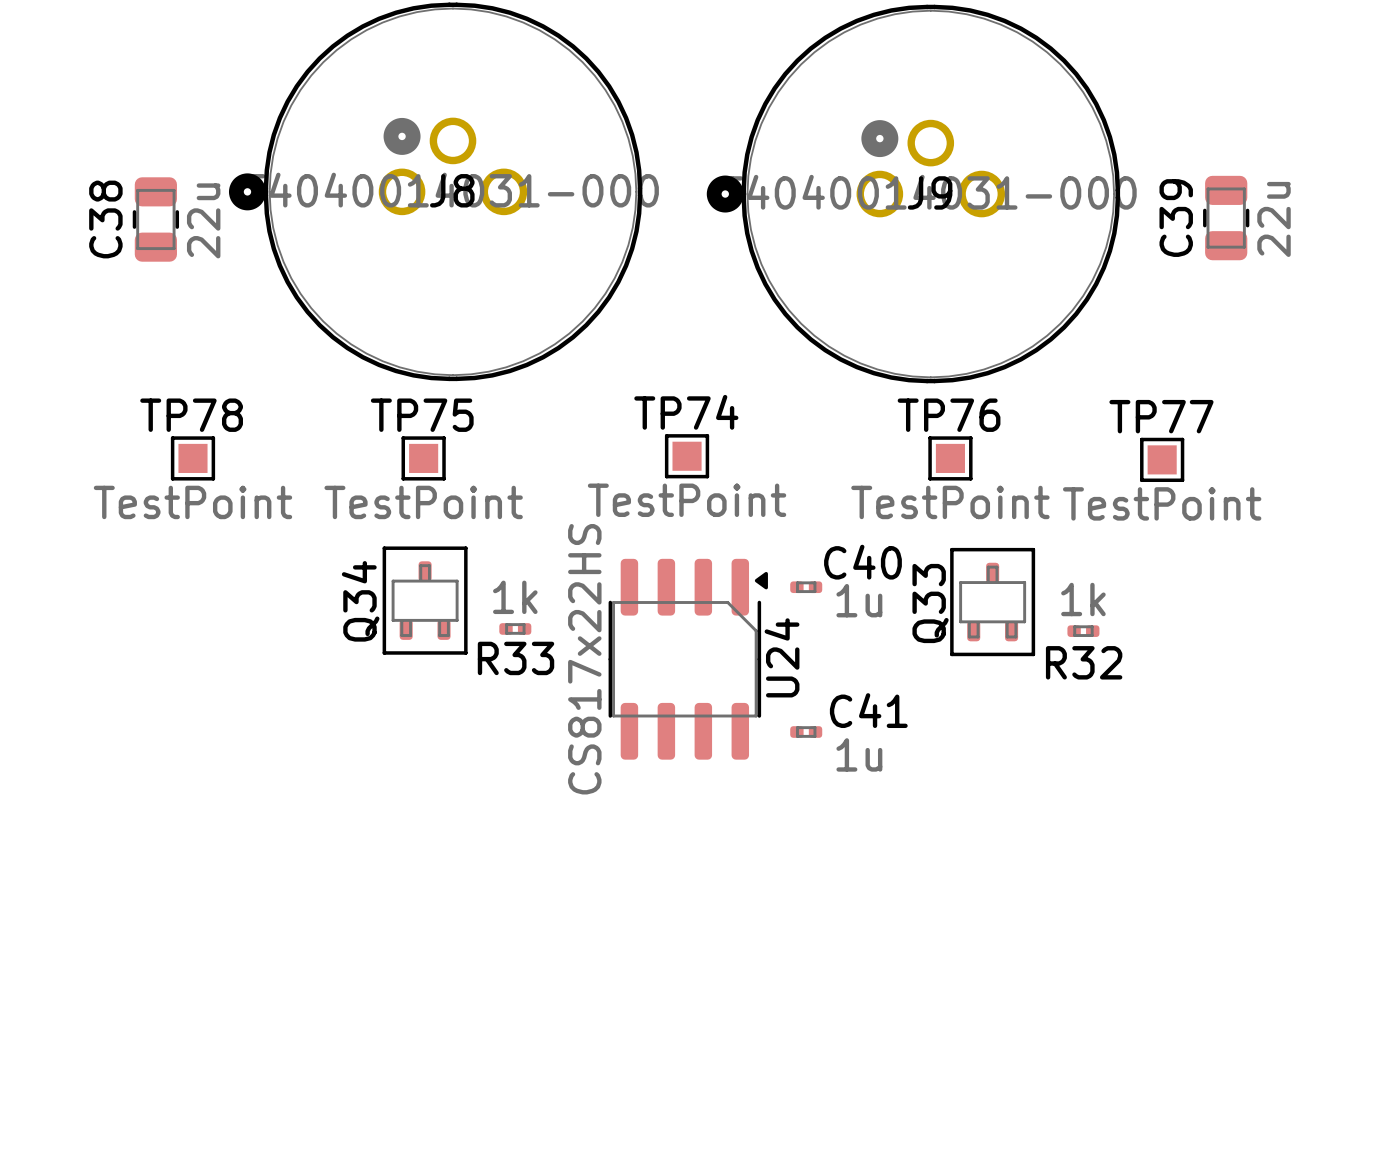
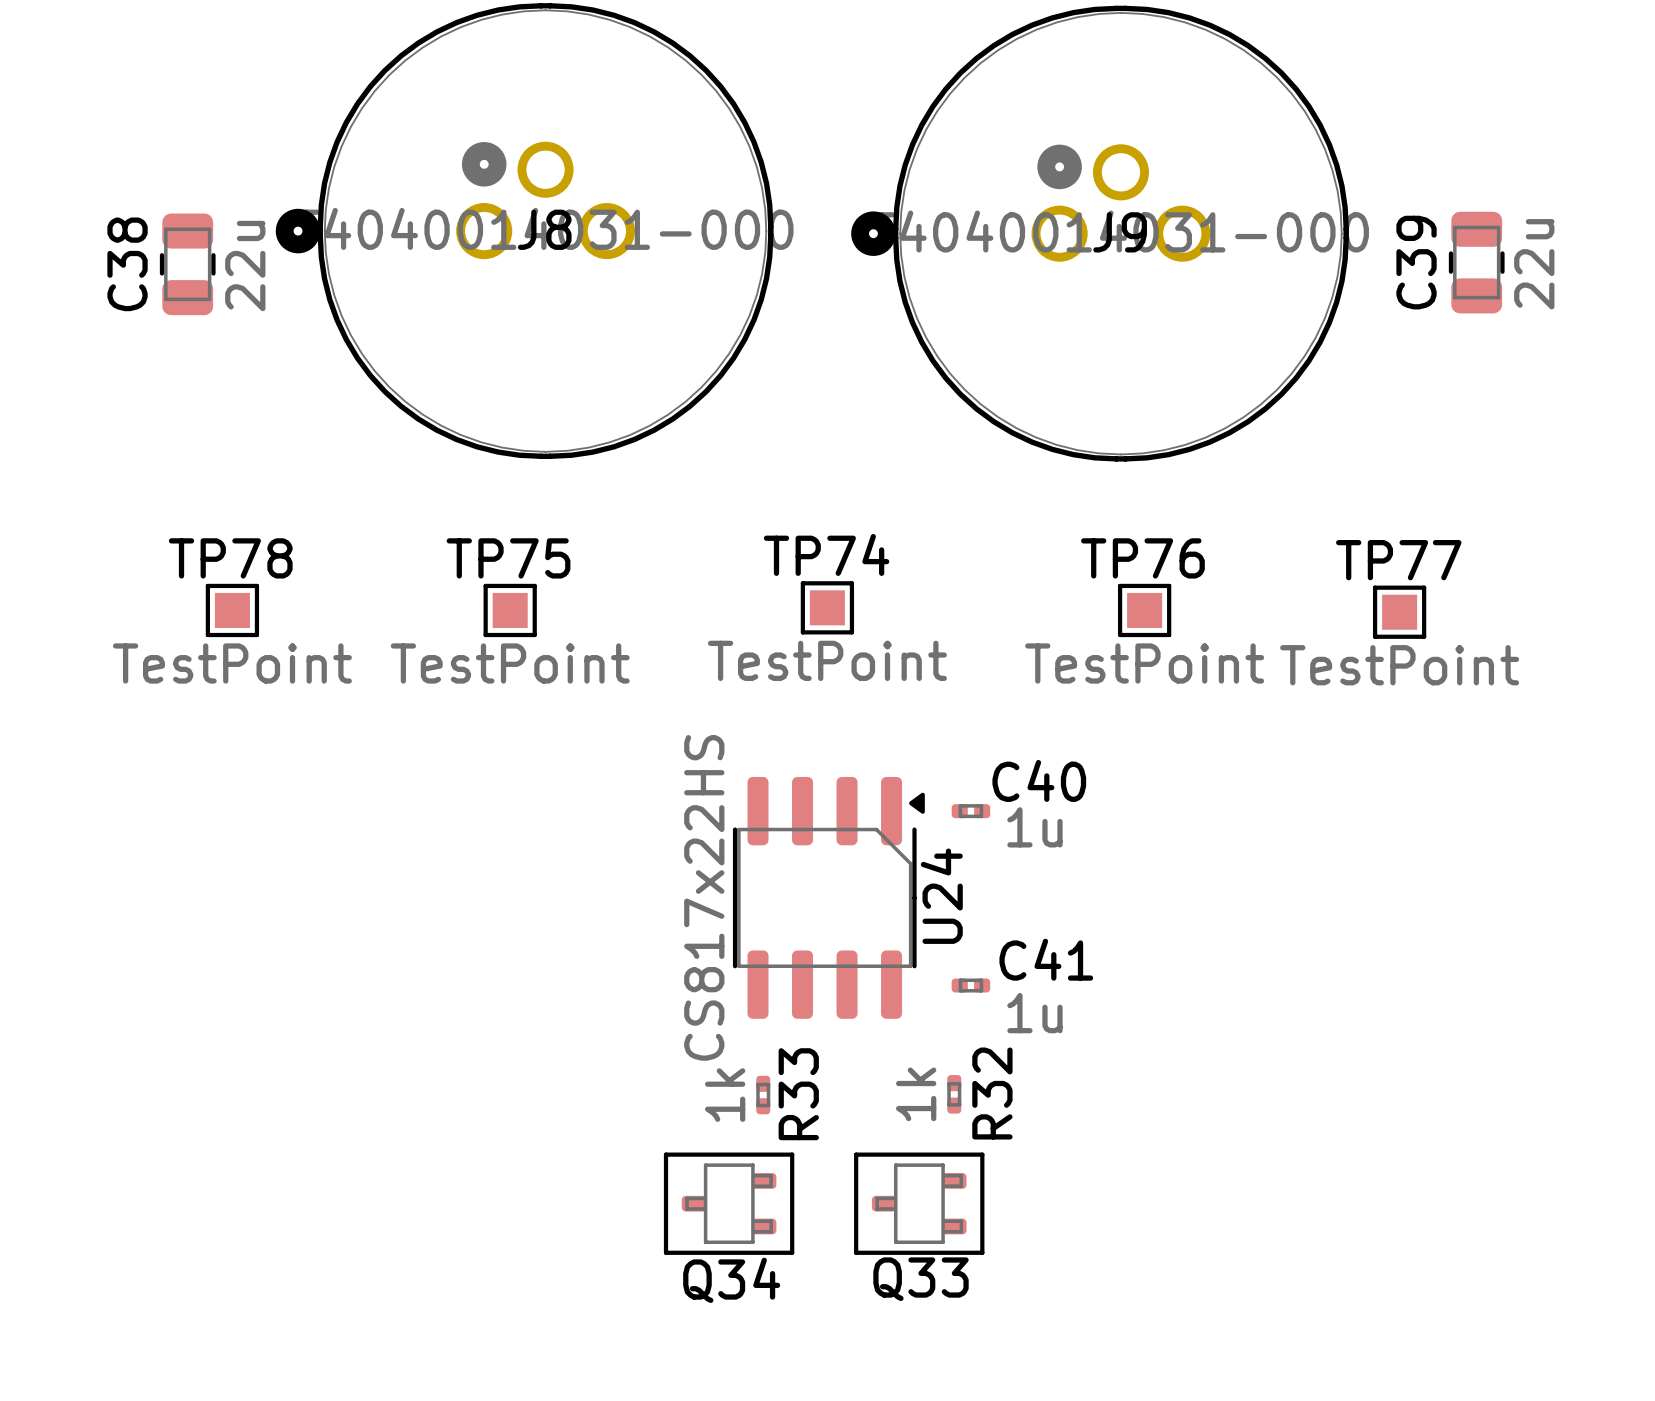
TP74 position: (687, 456) -> (827, 607)
TP78 position: (192, 458) -> (232, 610)
TP75 position: (423, 458) -> (510, 610)
TP76 position: (950, 458) -> (1144, 610)
TP77 position: (1162, 459) -> (1399, 612)
C40 position: (806, 587) -> (970, 811)
Q34 rotation: 0° (425, 600) -> 90° counterclockwise (729, 1203)
Q34 position: (425, 600) -> (729, 1203)
Q33 rotation: 0° (992, 602) -> 90° counterclockwise (919, 1203)
Q33 position: (992, 602) -> (919, 1203)
R33 rotation: 0° (515, 628) -> 90° clockwise (763, 1095)
R33 position: (515, 628) -> (763, 1095)
R32 rotation: 0° (1083, 631) -> 90° clockwise (954, 1094)
R32 position: (1083, 631) -> (954, 1094)
U24 position: (688, 659) -> (828, 897)
C41 position: (806, 732) -> (970, 985)

